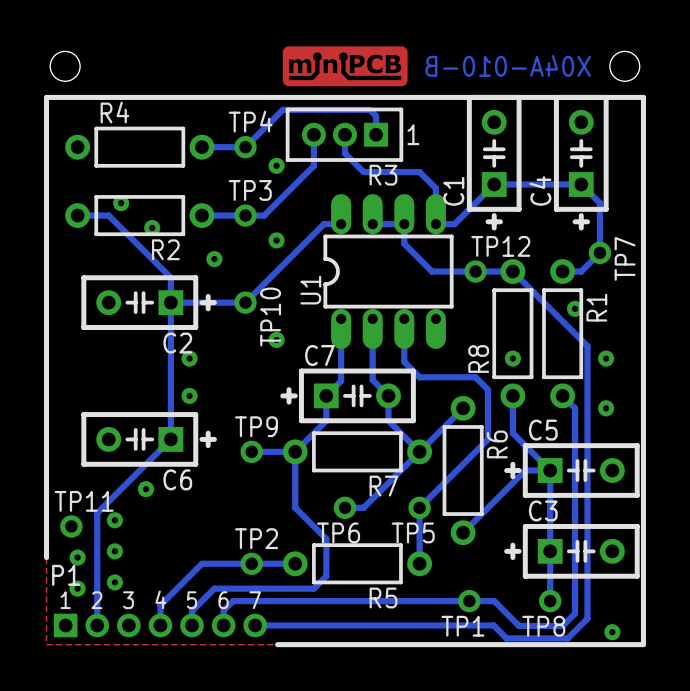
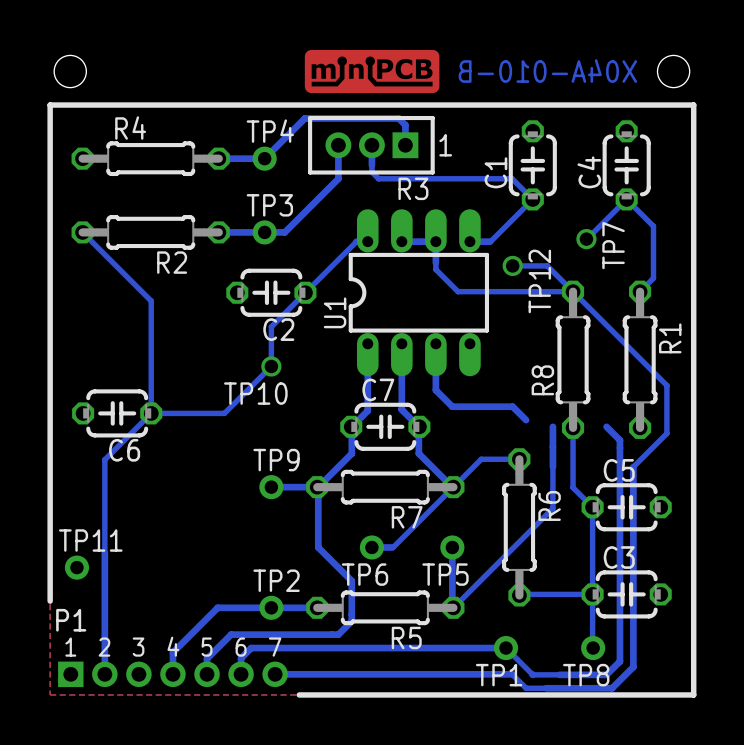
C1 footprint: [466, 94, 522, 231] -> [508, 120, 557, 211]
C4 footprint: [553, 94, 609, 231] -> [602, 120, 651, 211]
R4 footprint: [65, 126, 215, 168] -> [71, 141, 230, 177]
bottom track: (344, 153) (363, 172) (419, 172) (435, 188) (435, 224) -> (371, 165) (371, 172) (378, 178) (512, 178) (532, 199) (490, 241)
via: (276, 165) -> none
R2 footprint: [65, 195, 215, 237] -> [71, 215, 230, 250]
via: (121, 203) -> none
bottom track: none -> (82, 232) (151, 301) (151, 413)
bottom track: (77, 215) (108, 215) (170, 277) (170, 439) (97, 513) -> (151, 413) (104, 459) (104, 553)
bottom track: none -> (586, 239) (626, 199) (653, 226) (653, 278) (640, 291)
bottom track: (330, 224) (323, 224) (245, 302) (170, 302) -> (356, 241) (271, 326) (271, 366) (224, 413) (151, 413)
bottom track: (454, 224) (494, 184) (581, 184) (599, 203) (599, 252) (581, 271) (562, 271) -> none
via: (152, 228) -> none
via: (276, 240) -> none
TP7 footprint: [588, 241, 612, 265] -> [576, 229, 597, 250]
bottom track: (404, 243) (432, 271) (512, 271) (587, 346) (587, 433) -> (512, 265) (547, 265) (666, 385) (666, 433) (633, 467)
bottom track: none -> (435, 262) (435, 269) (458, 291) (573, 291)
TP12 name position: TP12 (500, 246) -> TP12 (539, 281)
via: (214, 259) -> none
R8 footprint: [492, 259, 534, 409] -> [555, 280, 591, 439]
R1 footprint: [542, 259, 584, 409] -> [622, 280, 658, 439]
TP12 footprint: [464, 260, 487, 283] -> [502, 255, 523, 277]
C2 footprint: [81, 275, 217, 330] -> [226, 268, 317, 317]
TP10 footprint: [234, 291, 257, 314] -> [261, 356, 282, 377]
via: (575, 308) -> none
TP10 name position: TP10 (270, 317) -> TP10 (255, 393)
via: (276, 339) -> none
via: (189, 358) -> none
via: (512, 358) -> none
via: (606, 358) -> none
C7 footprint: [280, 368, 416, 424] -> [340, 402, 431, 451]
bottom track: (488, 389) (488, 439) (419, 507) -> none
via: (189, 395) -> none
R6 footprint: [442, 395, 484, 546] -> [502, 448, 537, 607]
bottom track: (463, 408) (363, 507) -> (519, 459) (481, 459) (392, 547)
via: (606, 408) -> none
C6 footprint: [81, 412, 217, 467] -> [72, 389, 163, 438]
R7 footprint: [282, 431, 433, 473] -> [306, 469, 465, 505]
bottom track: (512, 433) (550, 470) -> (552, 467) (552, 508) (453, 607) (452, 606)
C5 footprint: [504, 443, 640, 498] -> [581, 483, 672, 532]
bottom track: (550, 470) (550, 601) -> (573, 427) (573, 487) (592, 507) (593, 648)
bottom track: (550, 470) (525, 470) (463, 532) -> none
via: (146, 489) -> none
via: (114, 520) -> none
C3 footprint: [504, 523, 640, 579] -> [581, 570, 672, 619]
R5 footprint: [282, 543, 433, 585] -> [306, 590, 465, 626]
via: (114, 551) -> none
bottom track: none -> (592, 594) (519, 595)
via: (77, 557) -> none
via: (114, 582) -> none
via: (77, 588) -> none
bottom track: (469, 601) (494, 601) (519, 625) -> (506, 648) (532, 674) (559, 674)
bottom track: (475, 625) (493, 625) -> (512, 674) (526, 688) (546, 688)
bottom track: (494, 625) (506, 638) -> none
via: (612, 632) -> none

